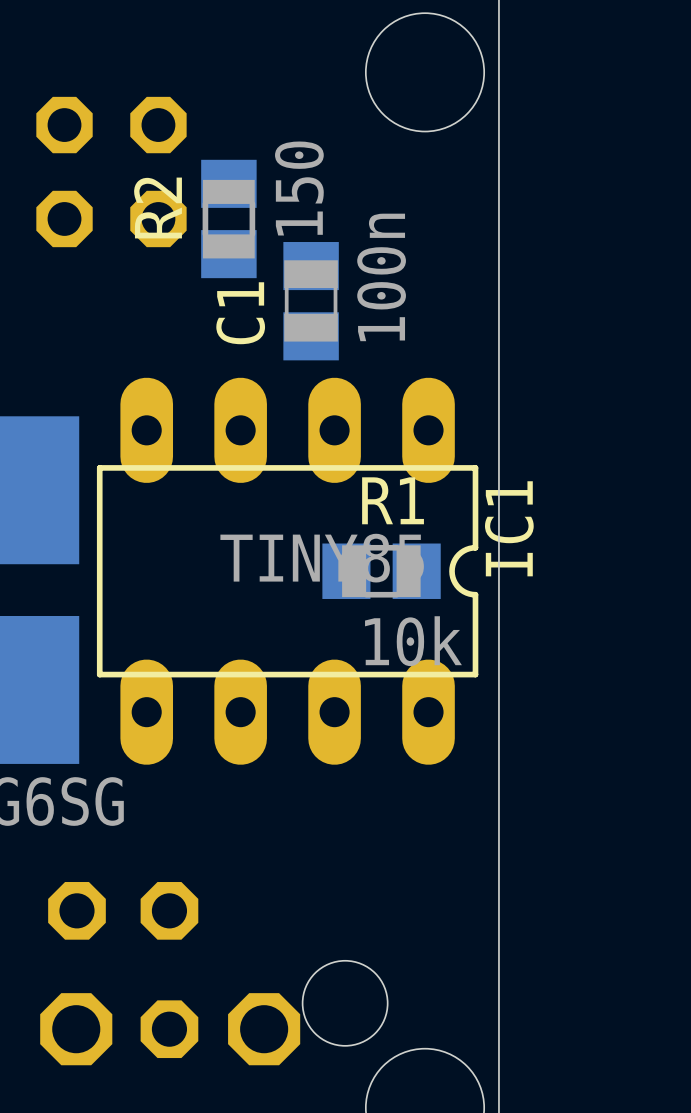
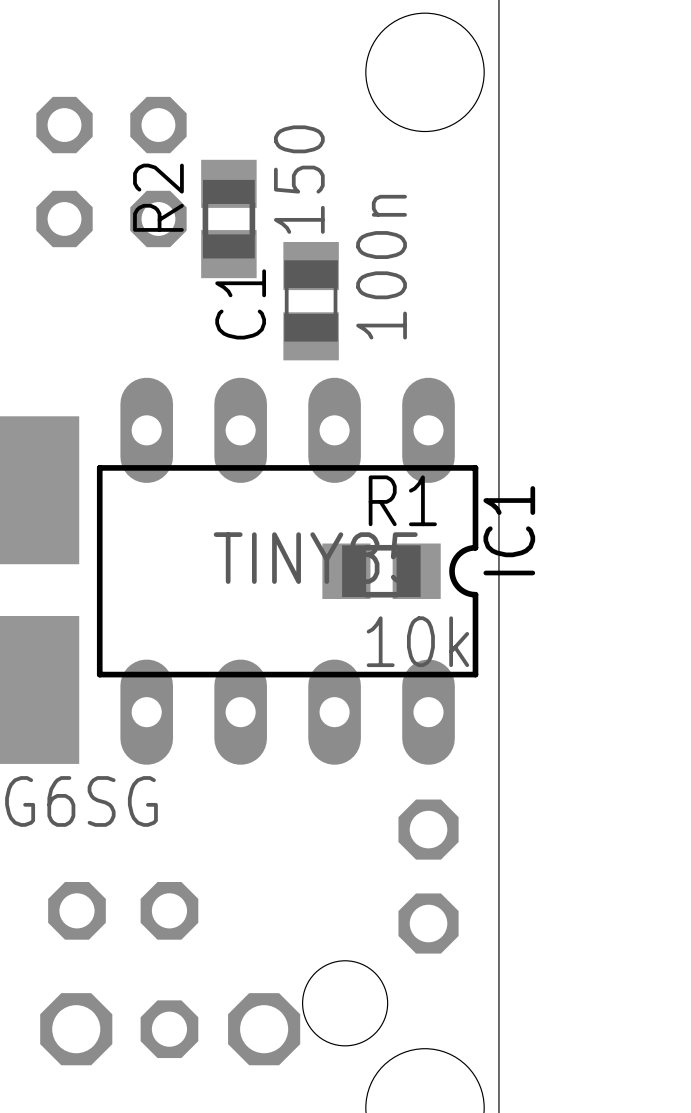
part: none -> (428, 829)
part: none -> (428, 923)

